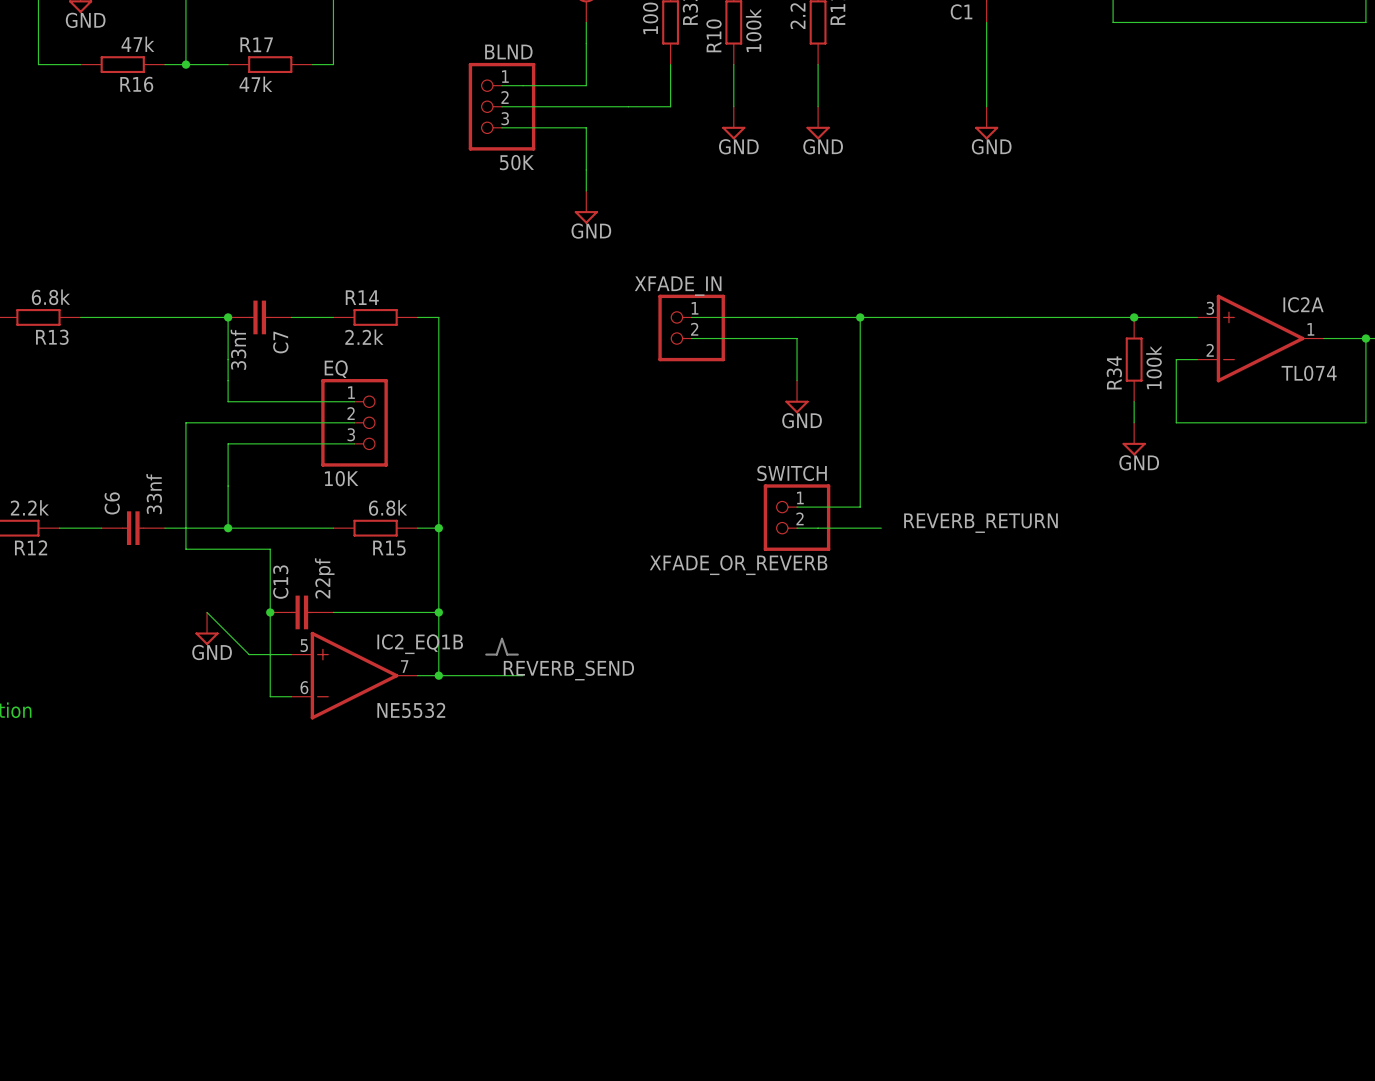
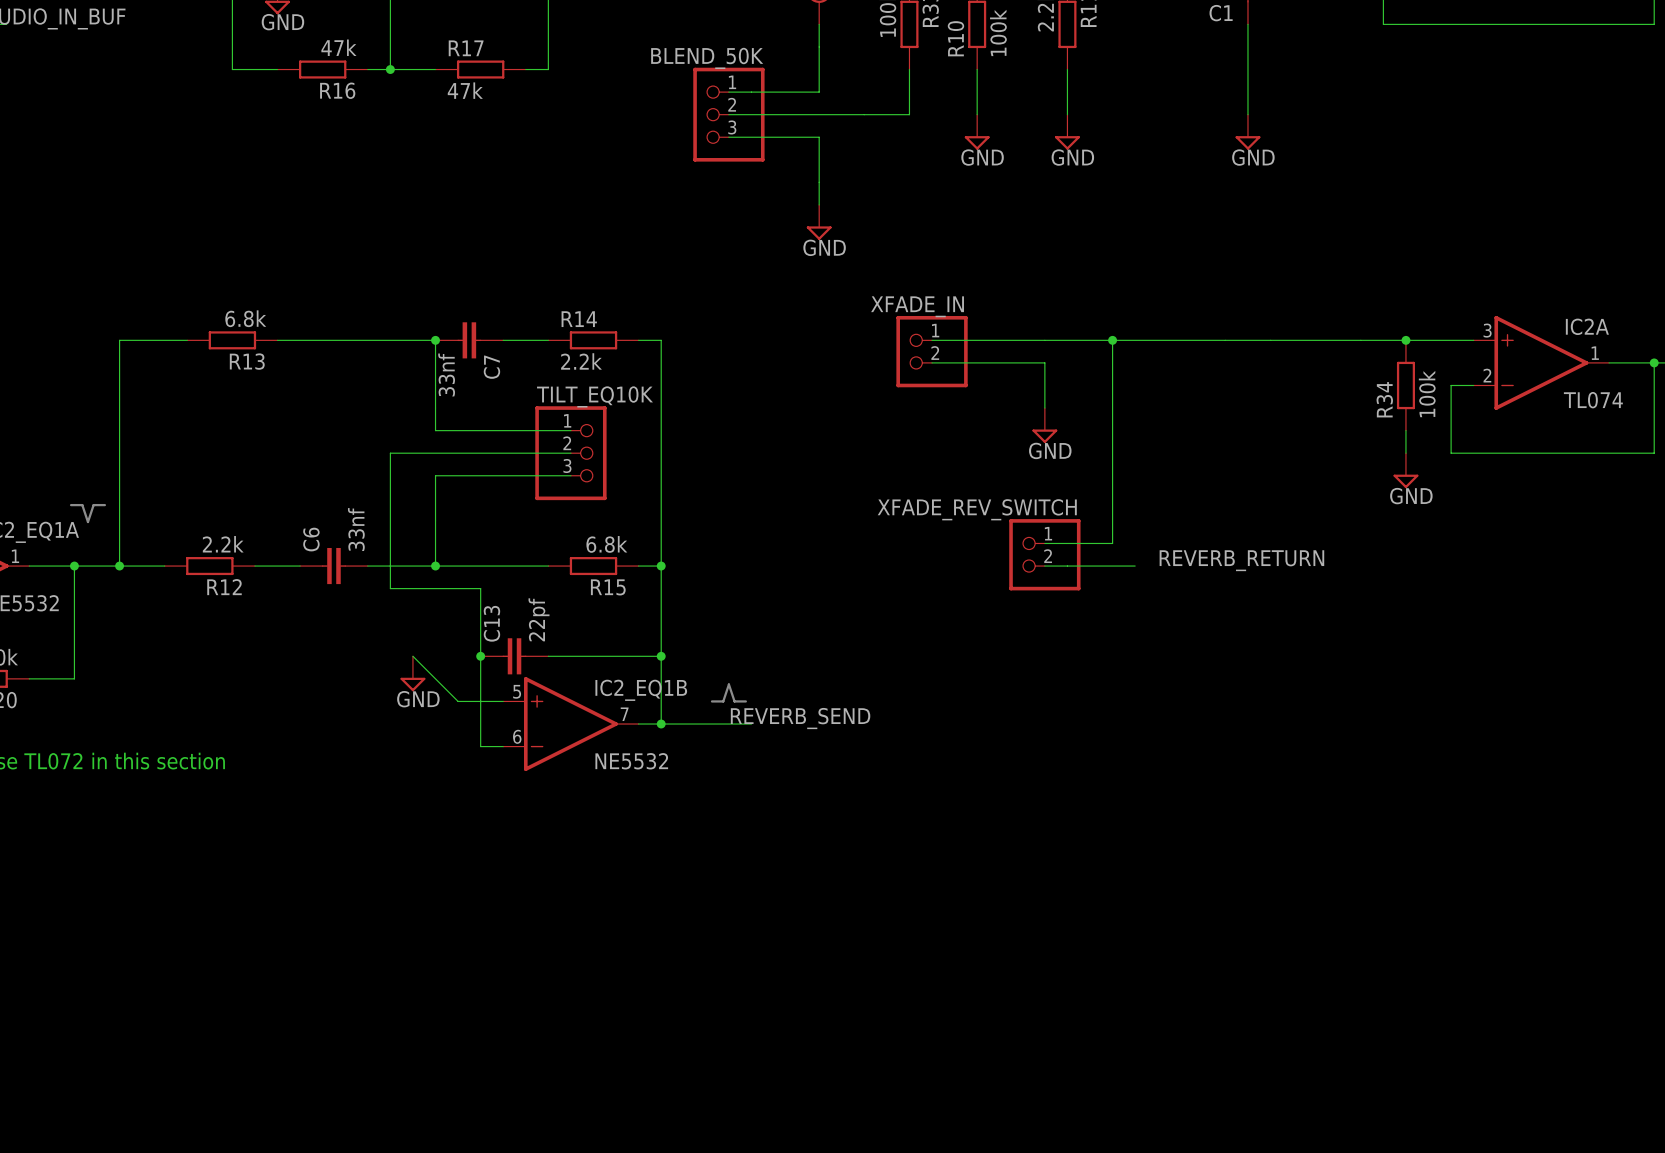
BLND name: BLND (508, 51) -> BLEND_50K (707, 58)
BLND value: 50K (516, 162) -> none
EQ name: EQ (336, 369) -> TILT_EQ10K (594, 396)
SWITCH name: SWITCH (792, 473) -> XFADE_REV_SWITCH (977, 509)
EQ value: 10K (341, 478) -> none
SWITCH value: XFADE_OR_REVERB (738, 565) -> none

